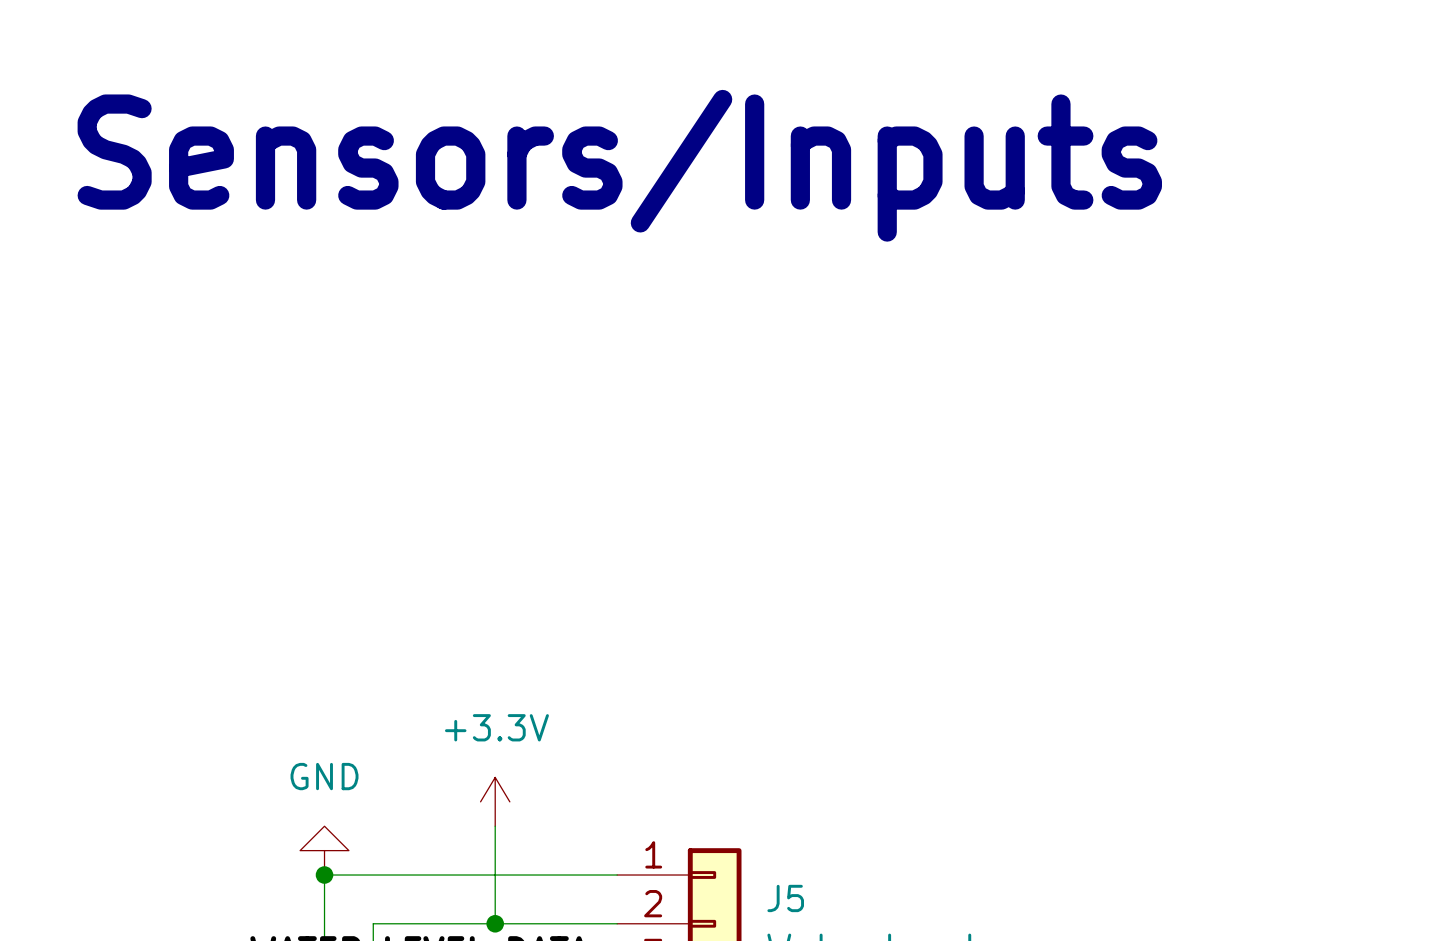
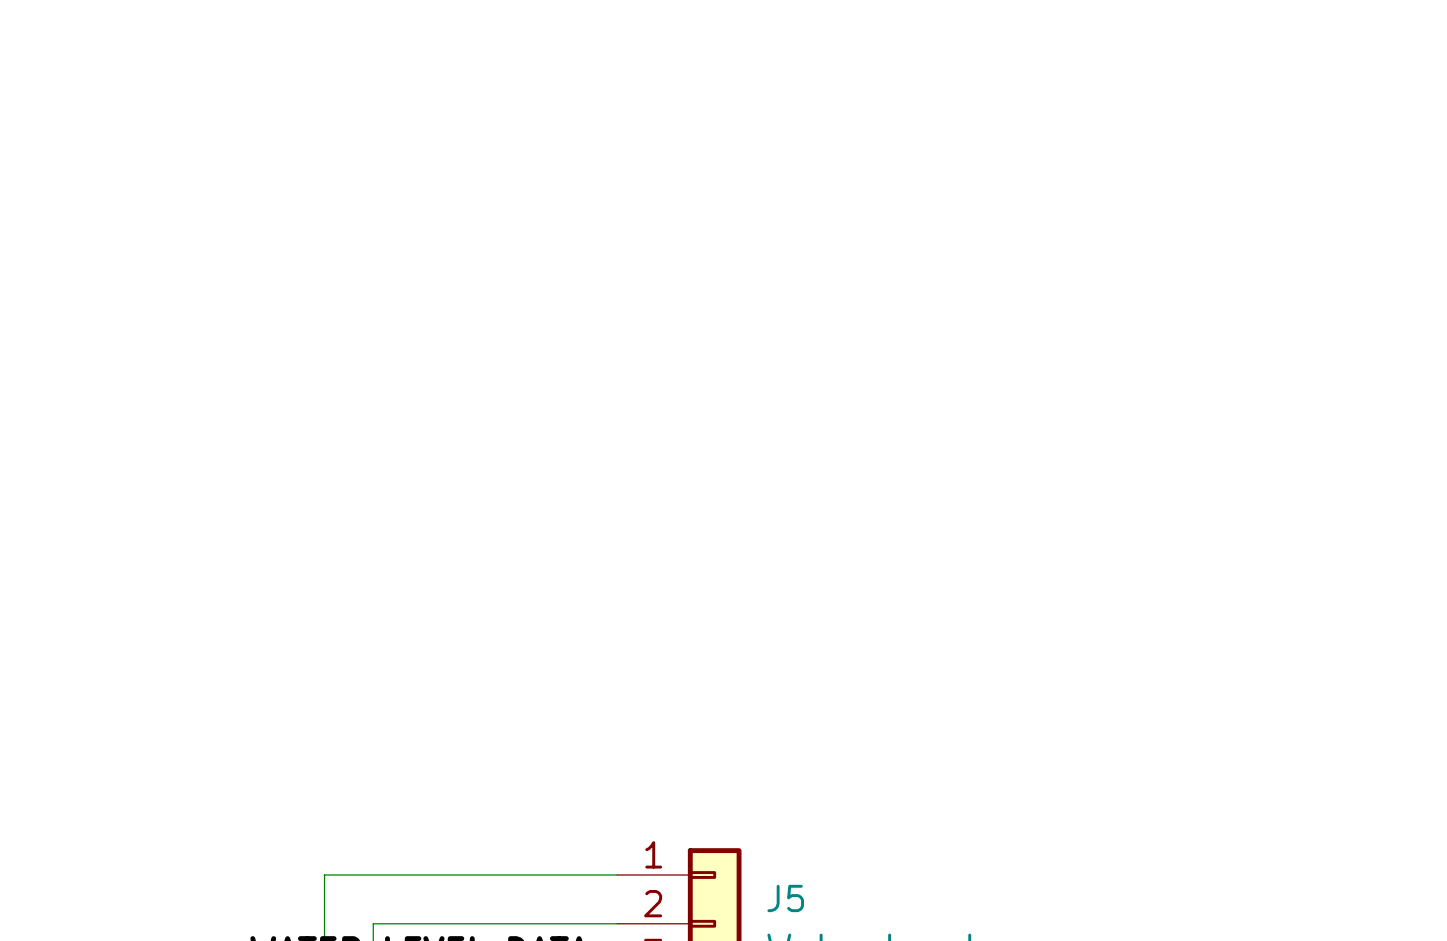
text: Sensors/Inputs (619, 165) -> none
power symbol: +3.3V (495, 801) -> none
wire: (495, 826) (495, 923) -> none
power symbol: GND (324, 850) -> none
junction: (324, 875) -> none
junction: (495, 923) -> none

